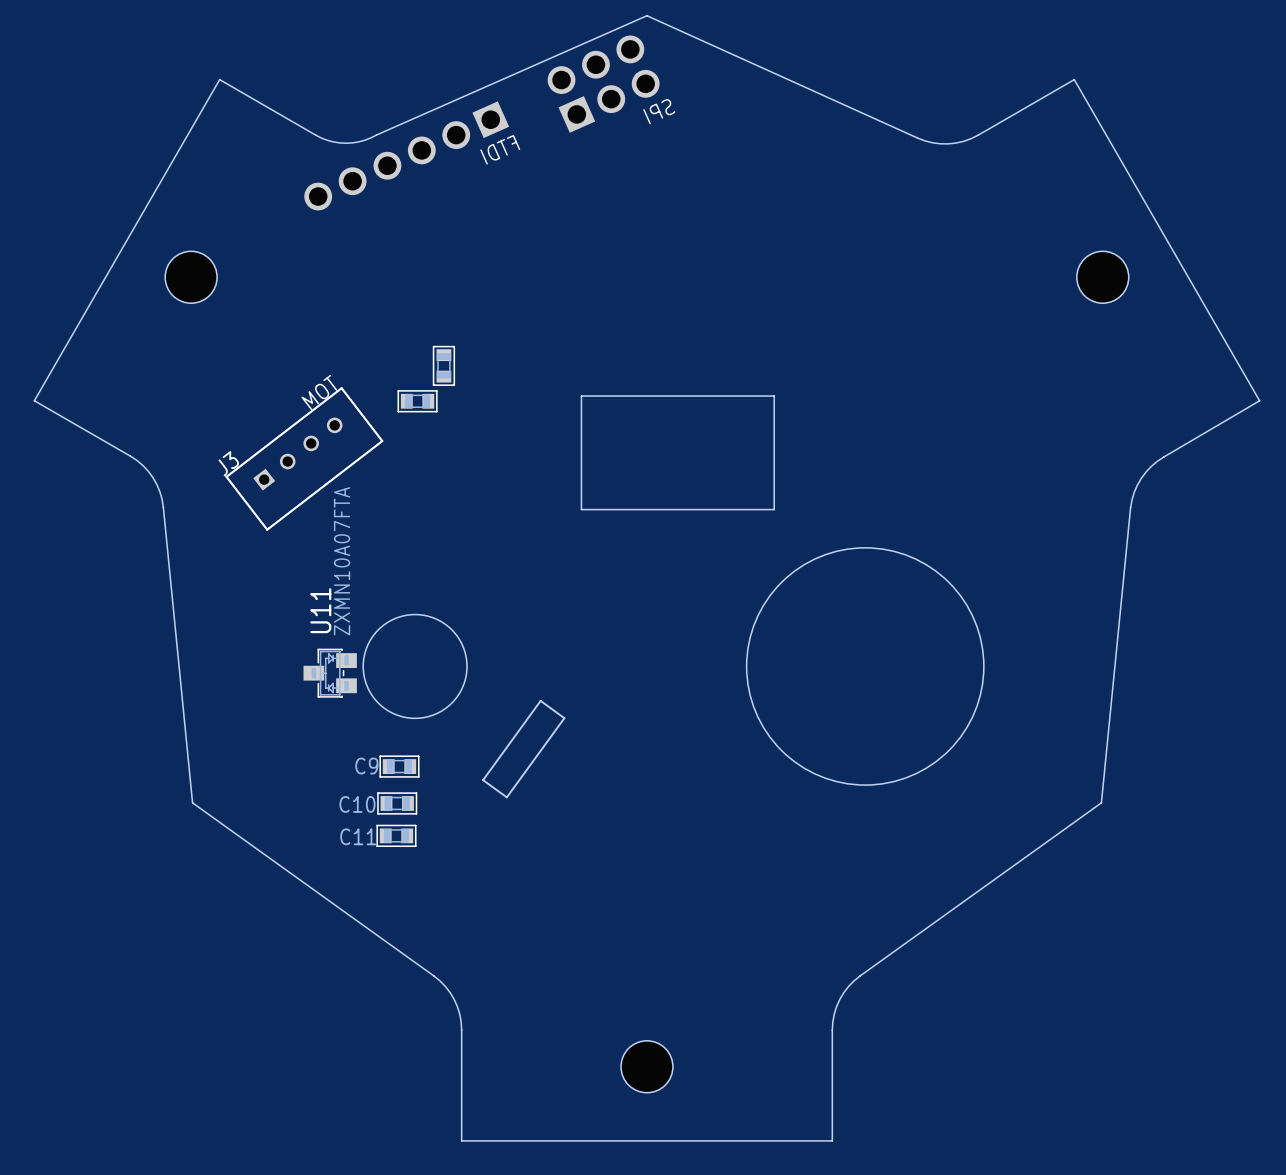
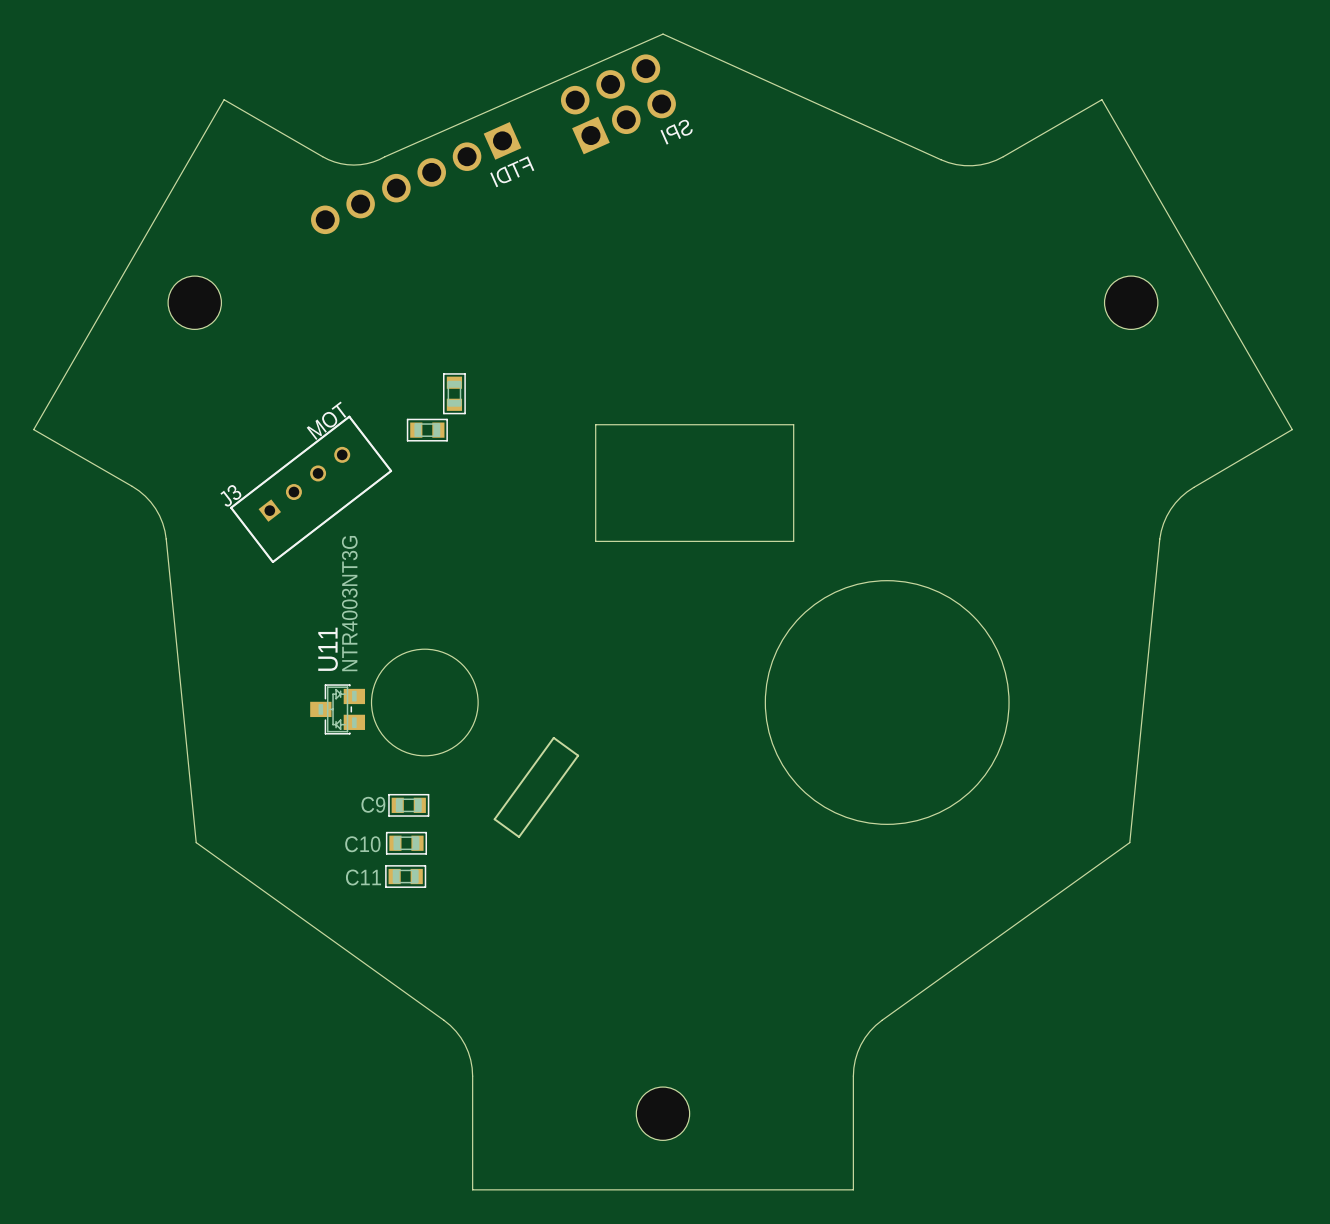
U11 value: ZXMN10A07FTA (342, 561) -> NTR4003NT3G (349, 603)

